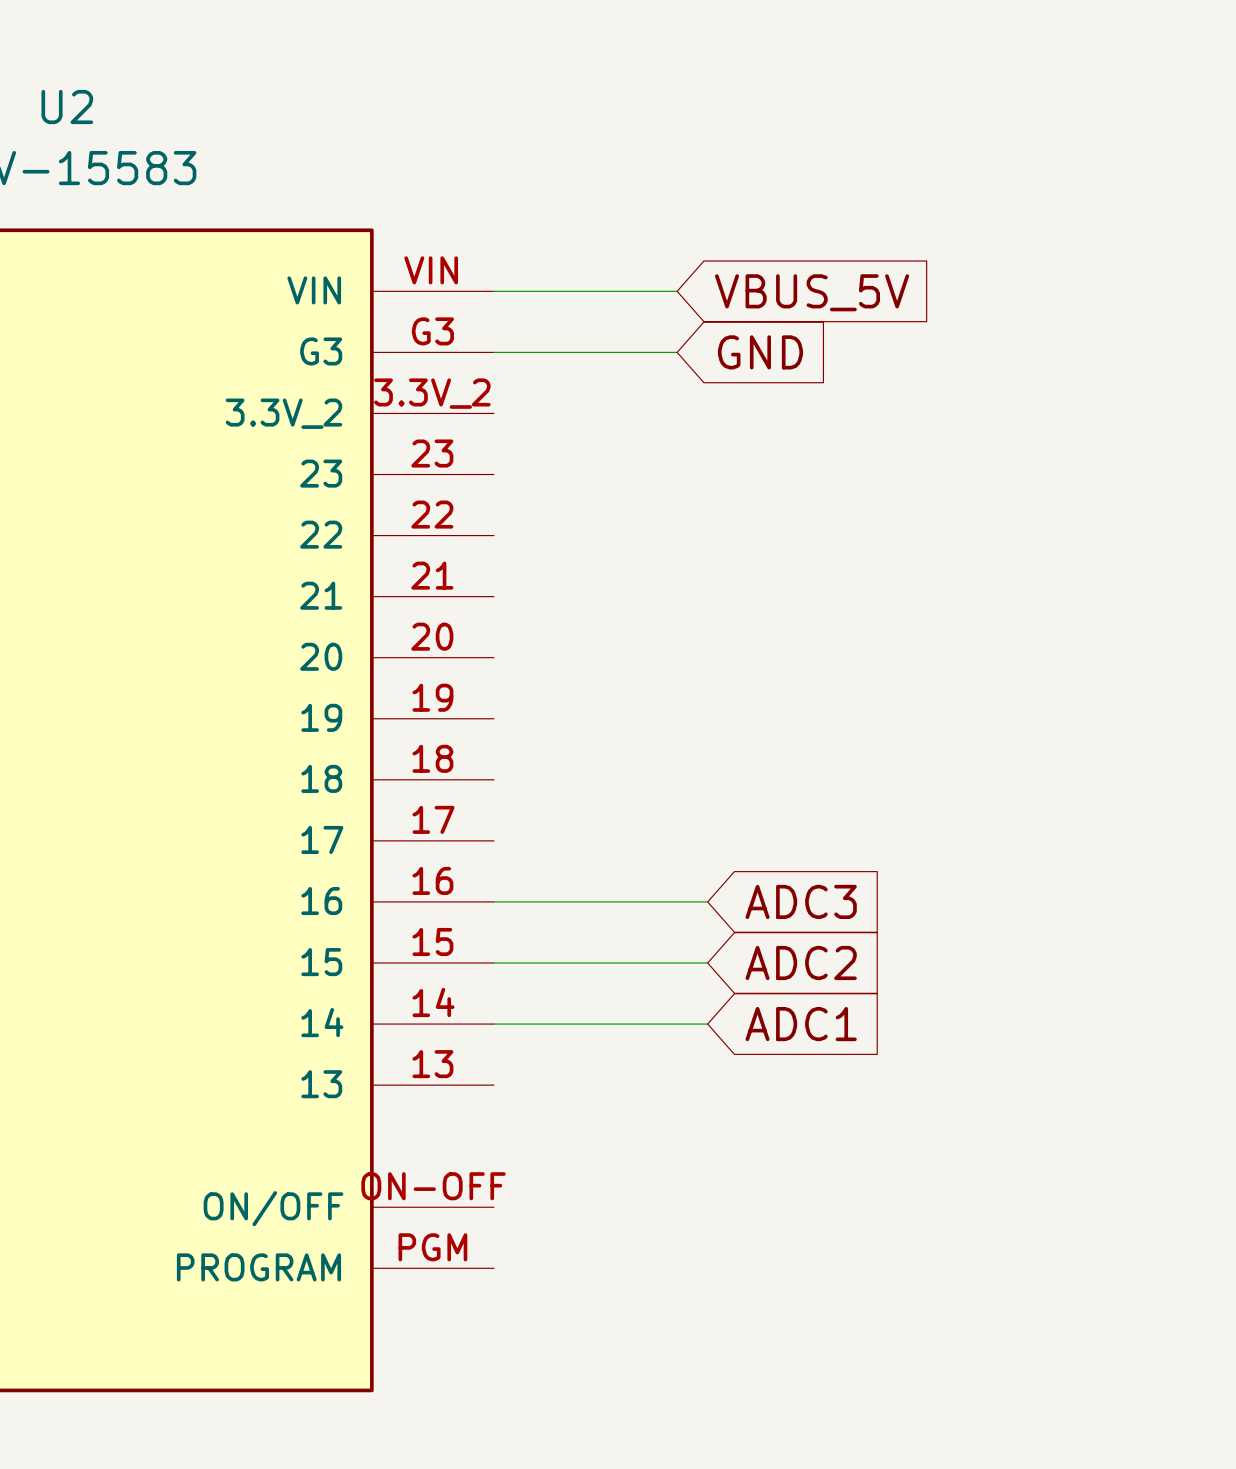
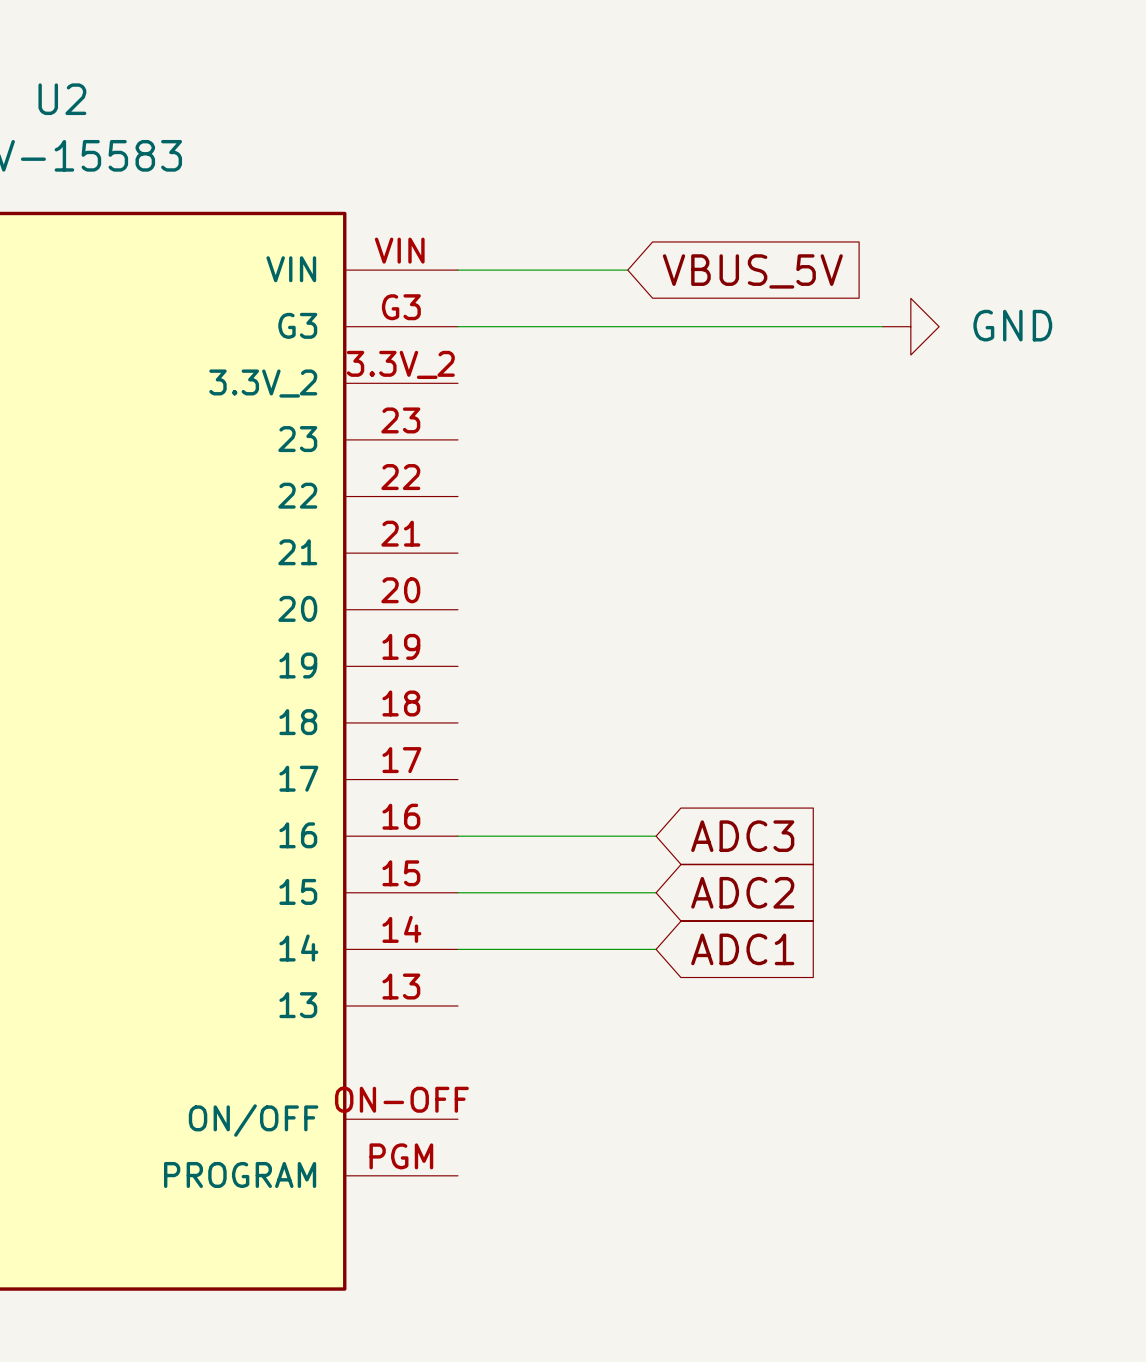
wire: none -> (627, 326) (882, 326)
global label: GND (760, 352) -> none
power symbol: none -> GND (910, 326)

